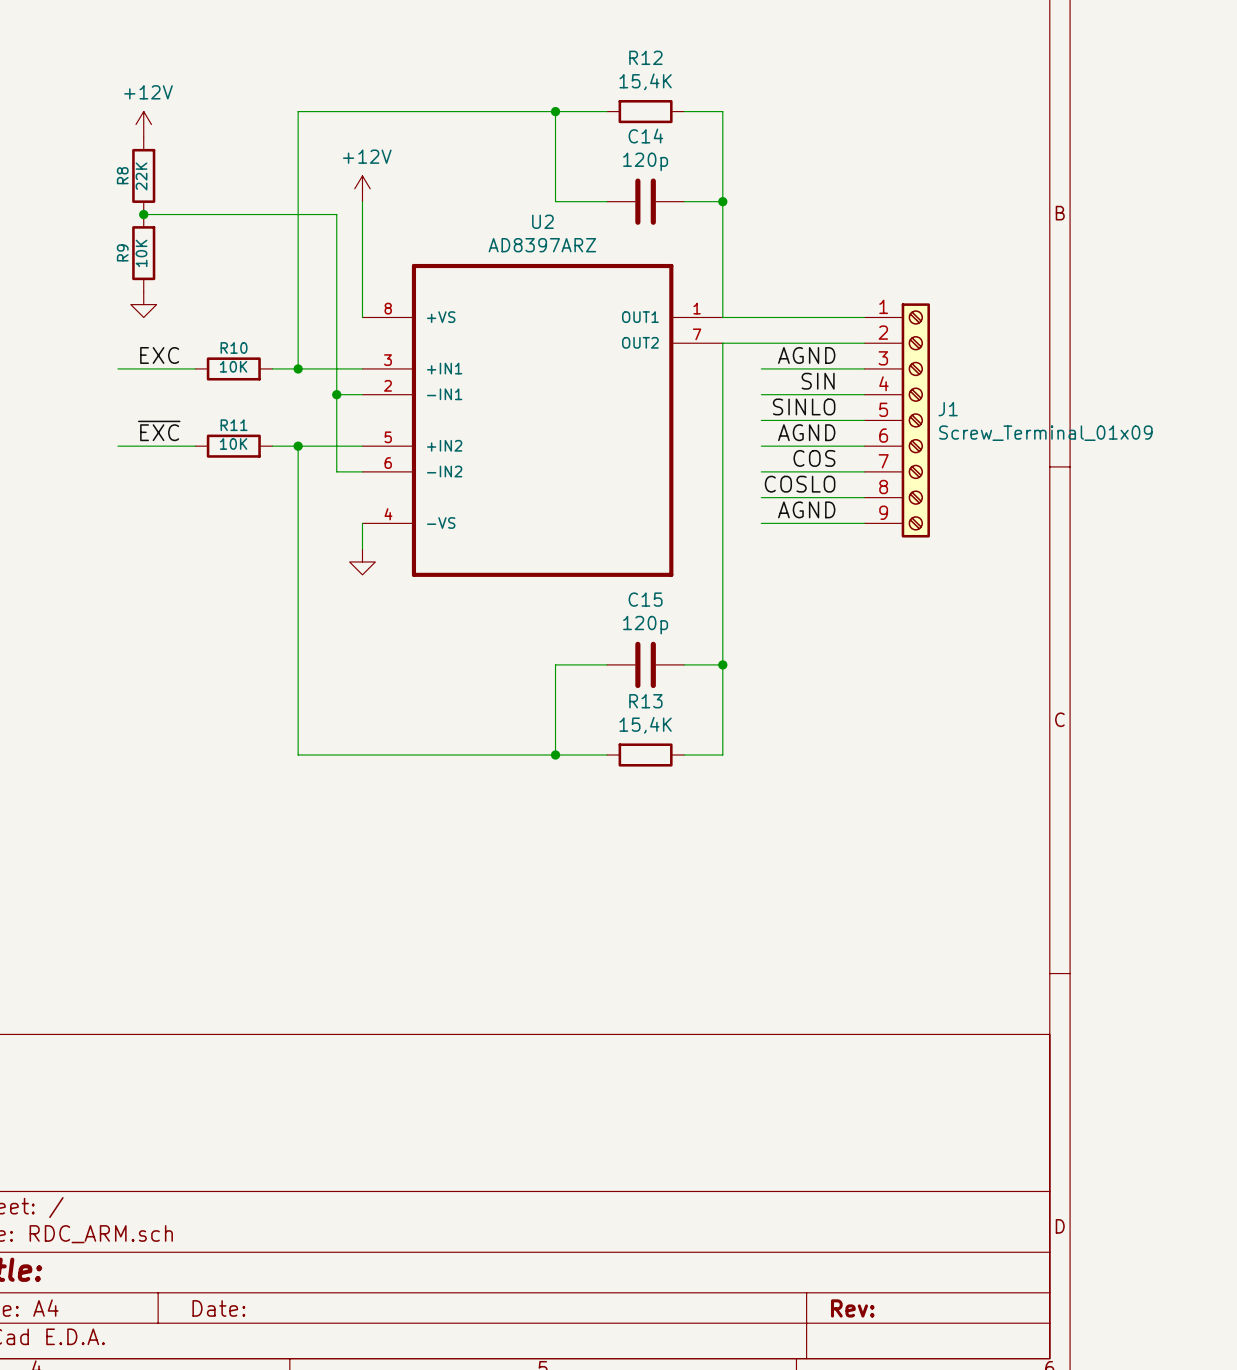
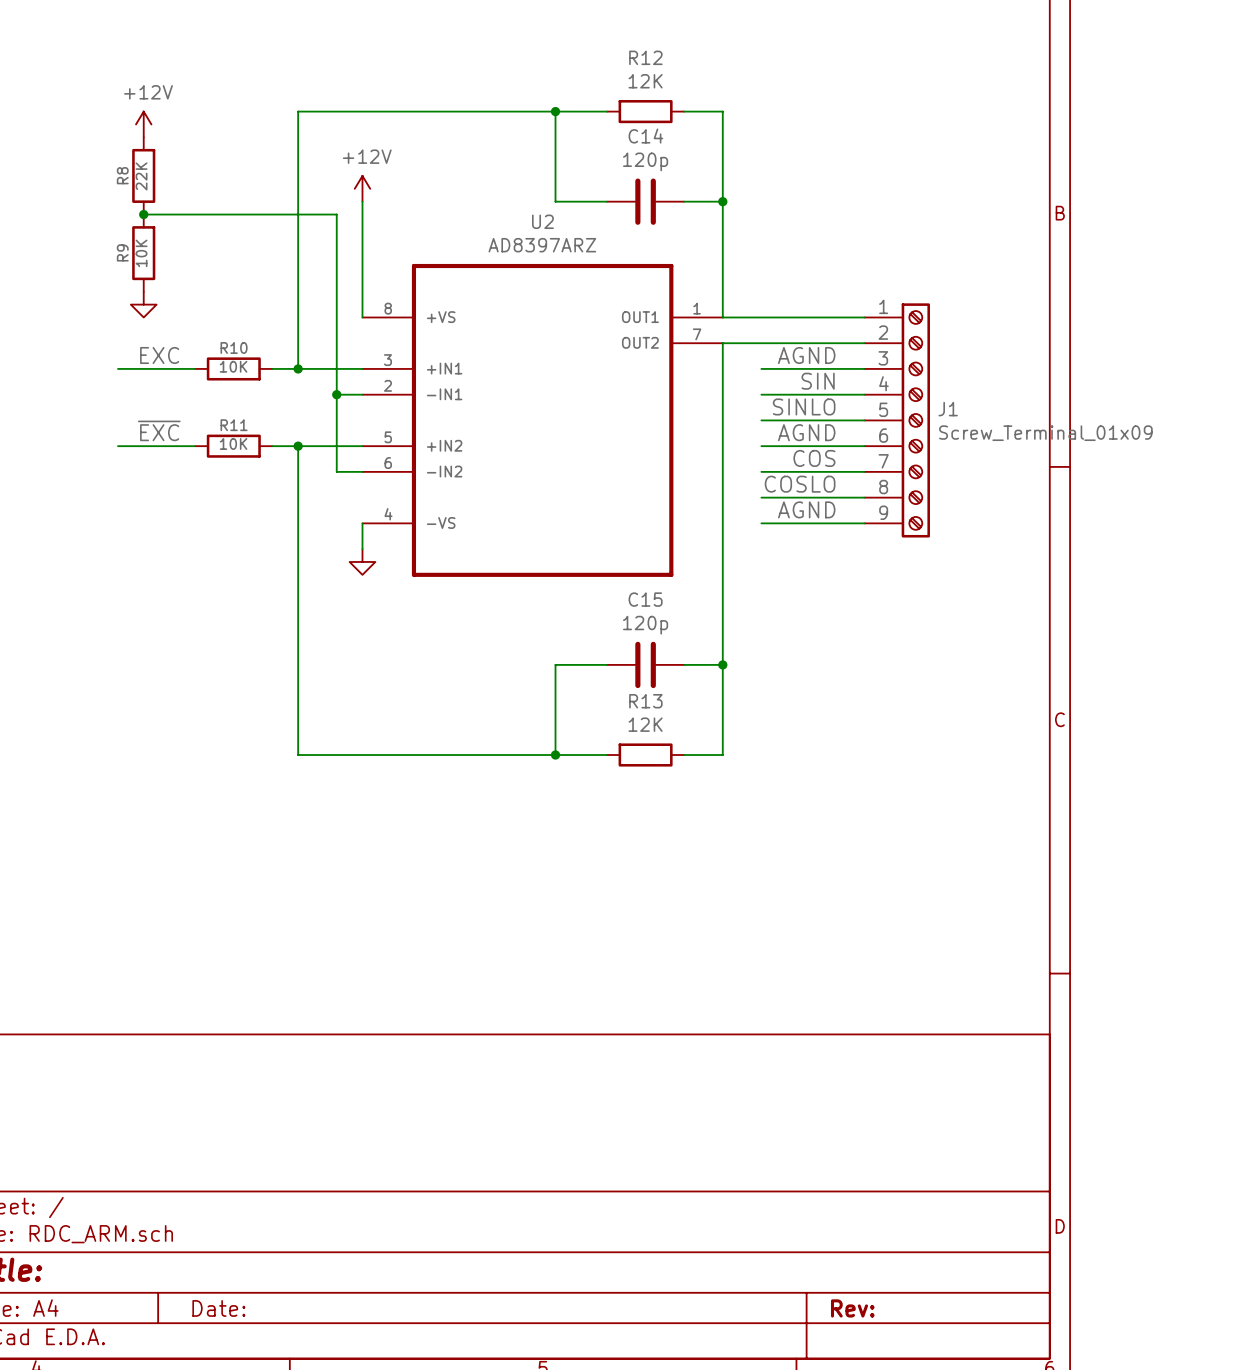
R12 value: 15,4K (645, 81) -> 12K (645, 81)
R13 value: 15,4K (645, 725) -> 12K (645, 724)

